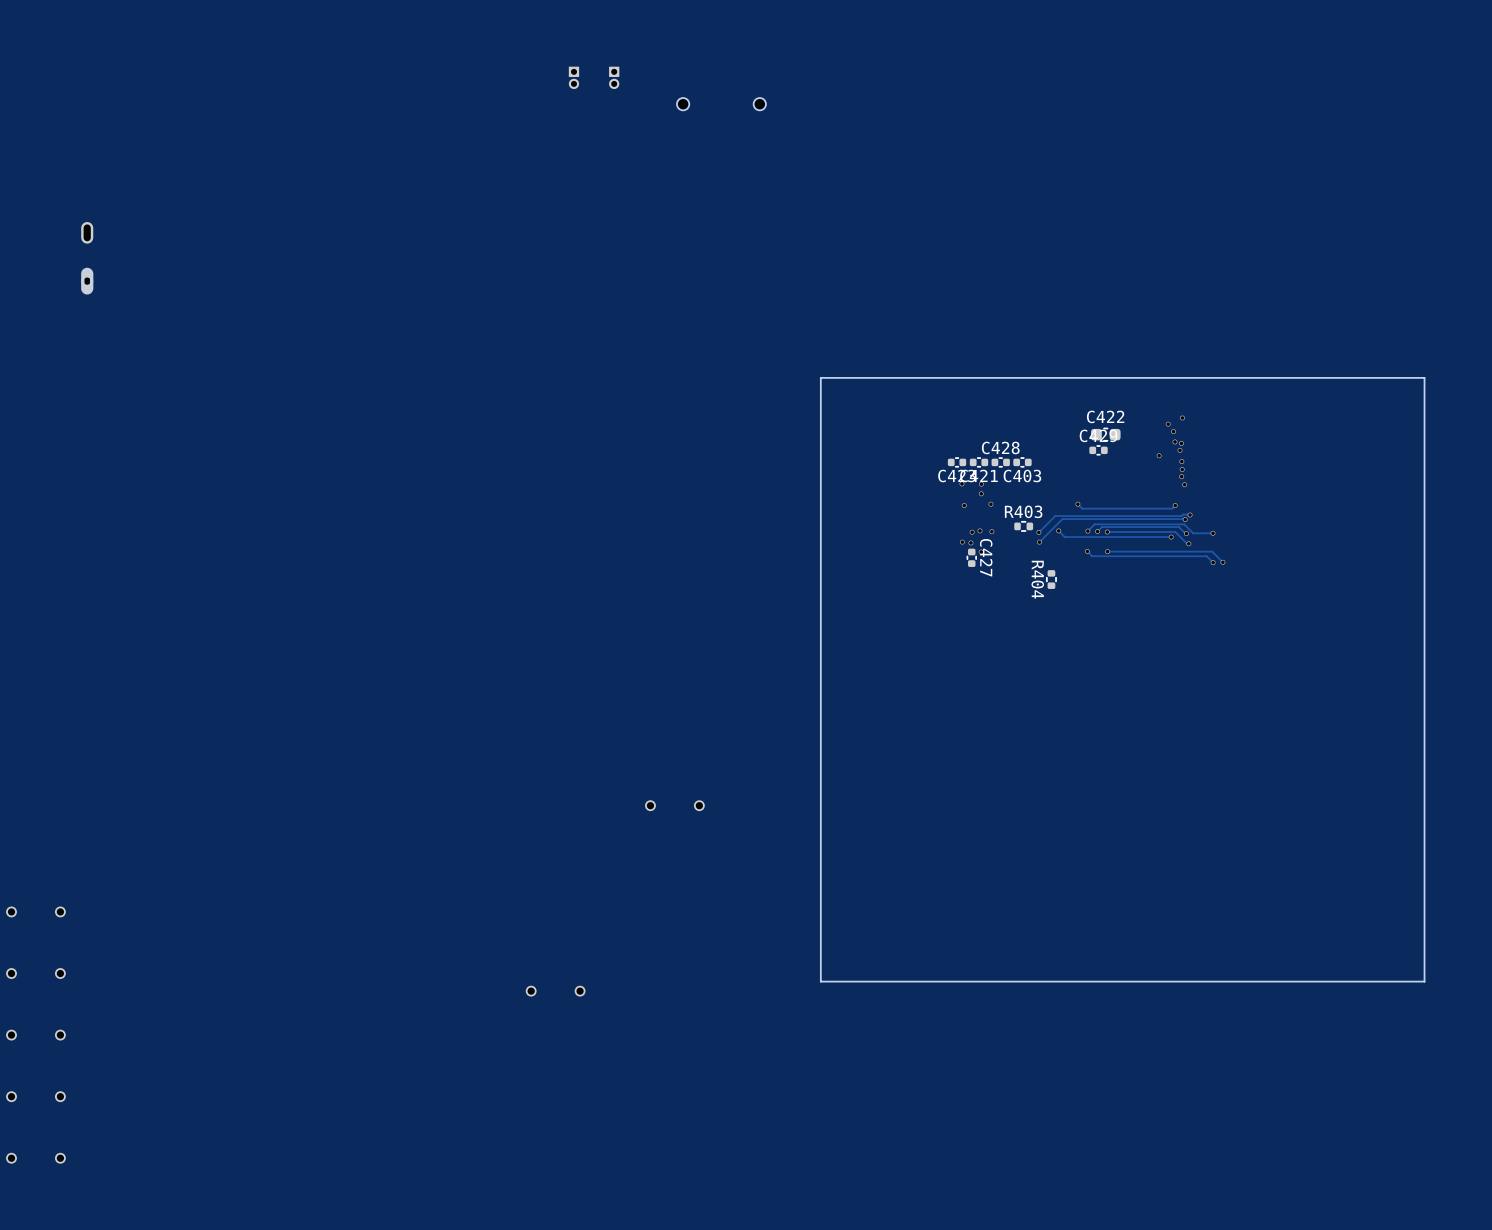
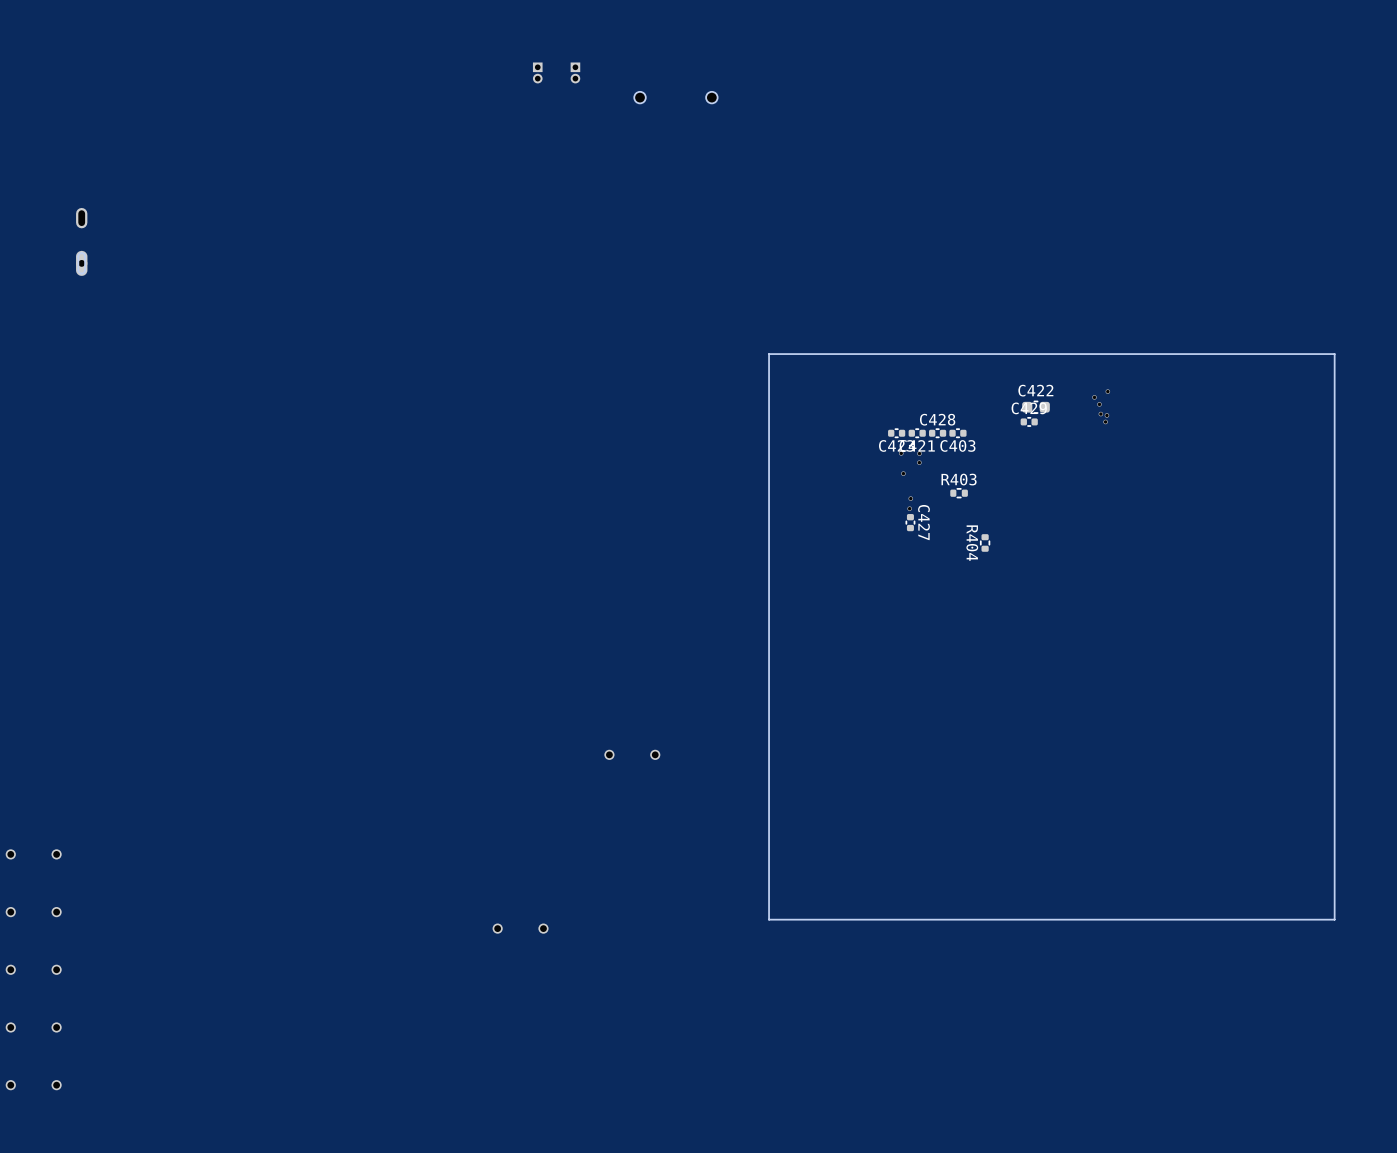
via: (1159, 455) -> none
via: (1181, 461) -> none
via: (1182, 469) -> none
via: (1181, 476) -> none
via: (1184, 484) -> none
via: (990, 504) -> none
track: (1077, 504) (1082, 508) (1172, 508) (1175, 505) -> none
via: (1077, 504) -> none
via: (1175, 505) -> none
track: (1190, 515) (1055, 516) (1038, 532) -> none
via: (1190, 515) -> none
track: (1185, 519) (1062, 519) (1039, 542) -> none
via: (1185, 519) -> none
via: (979, 530) -> none
via: (1058, 530) -> none
via: (991, 531) -> none
track: (1058, 531) (1064, 537) (1171, 537) -> none
track: (1087, 531) (1094, 524) (1184, 524) (1193, 533) (1212, 533) -> none
via: (1087, 531) -> none
track: (1097, 531) (1102, 527) (1178, 527) (1186, 533) -> none
via: (1097, 531) -> none
track: (1107, 531) (1175, 531) (1188, 543) -> none
via: (1107, 531) -> none
via: (1038, 532) -> none
via: (1186, 533) -> none
via: (1212, 533) -> none
via: (1171, 537) -> none
via: (962, 542) -> none
via: (1039, 542) -> none
via: (1188, 543) -> none
track: (1087, 551) (1092, 556) (1206, 556) (1213, 562) -> none
via: (1087, 551) -> none
track: (1107, 551) (1212, 551) (1222, 562) -> none
via: (1107, 551) -> none
via: (981, 552) -> none
via: (1213, 562) -> none
via: (1222, 562) -> none

